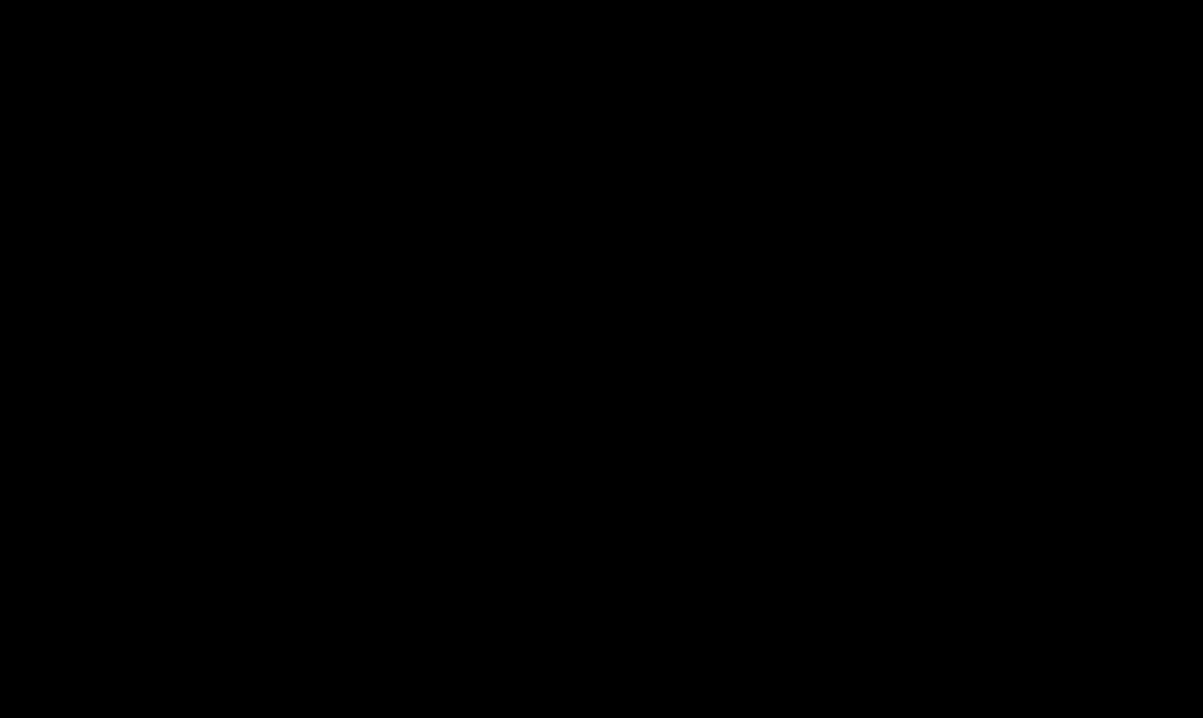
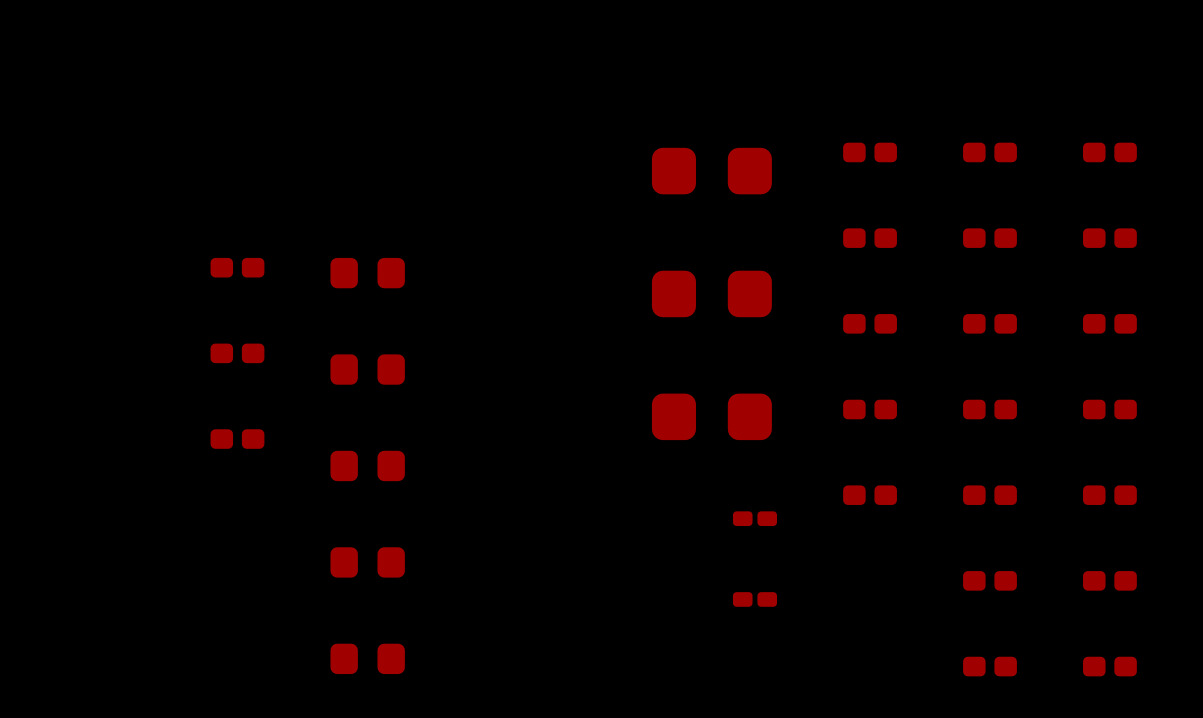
part: none -> (870, 152)
part: none -> (989, 152)
part: none -> (1109, 152)
part: none -> (711, 171)
part: none -> (870, 238)
part: none -> (989, 238)
part: none -> (1109, 238)
part: none -> (237, 267)
part: none -> (367, 273)
part: none -> (711, 293)
part: none -> (870, 323)
part: none -> (989, 323)
part: none -> (1109, 323)
part: none -> (237, 353)
part: none -> (367, 369)
part: none -> (870, 409)
part: none -> (989, 409)
part: none -> (1109, 409)
part: none -> (711, 416)
part: none -> (237, 439)
part: none -> (367, 465)
part: none -> (870, 495)
part: none -> (989, 495)
part: none -> (1109, 495)
part: none -> (754, 518)
part: none -> (367, 562)
part: none -> (989, 580)
part: none -> (1109, 580)
part: none -> (754, 599)
part: none -> (367, 658)
part: none -> (989, 666)
part: none -> (1109, 666)

